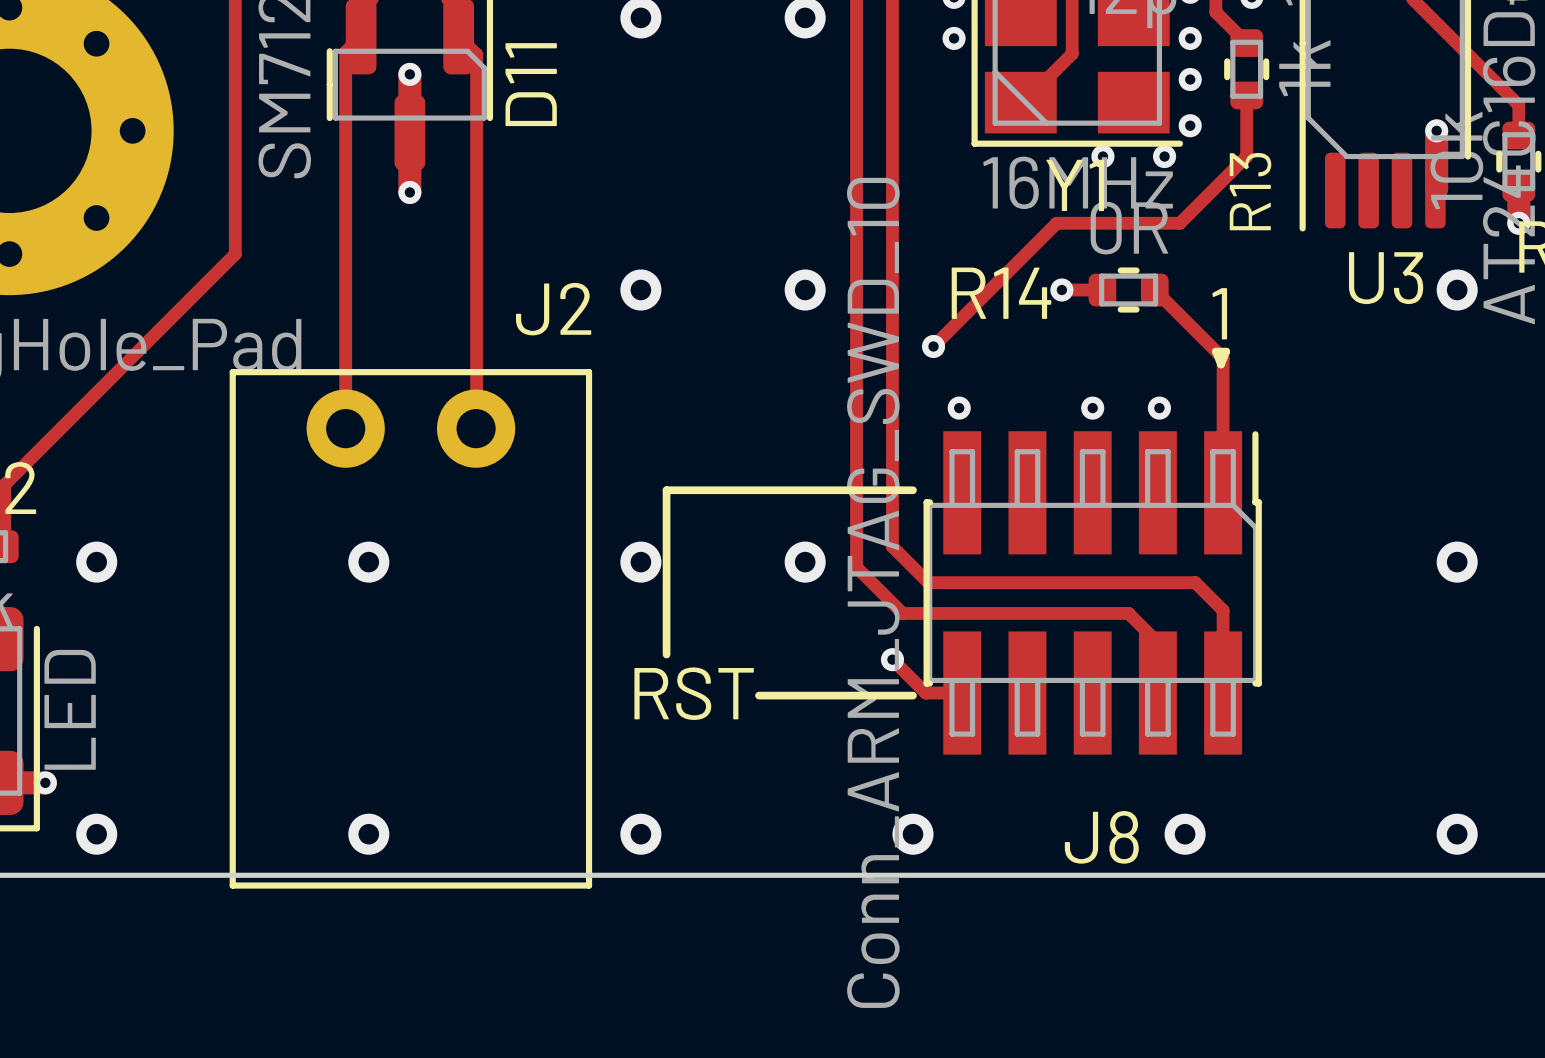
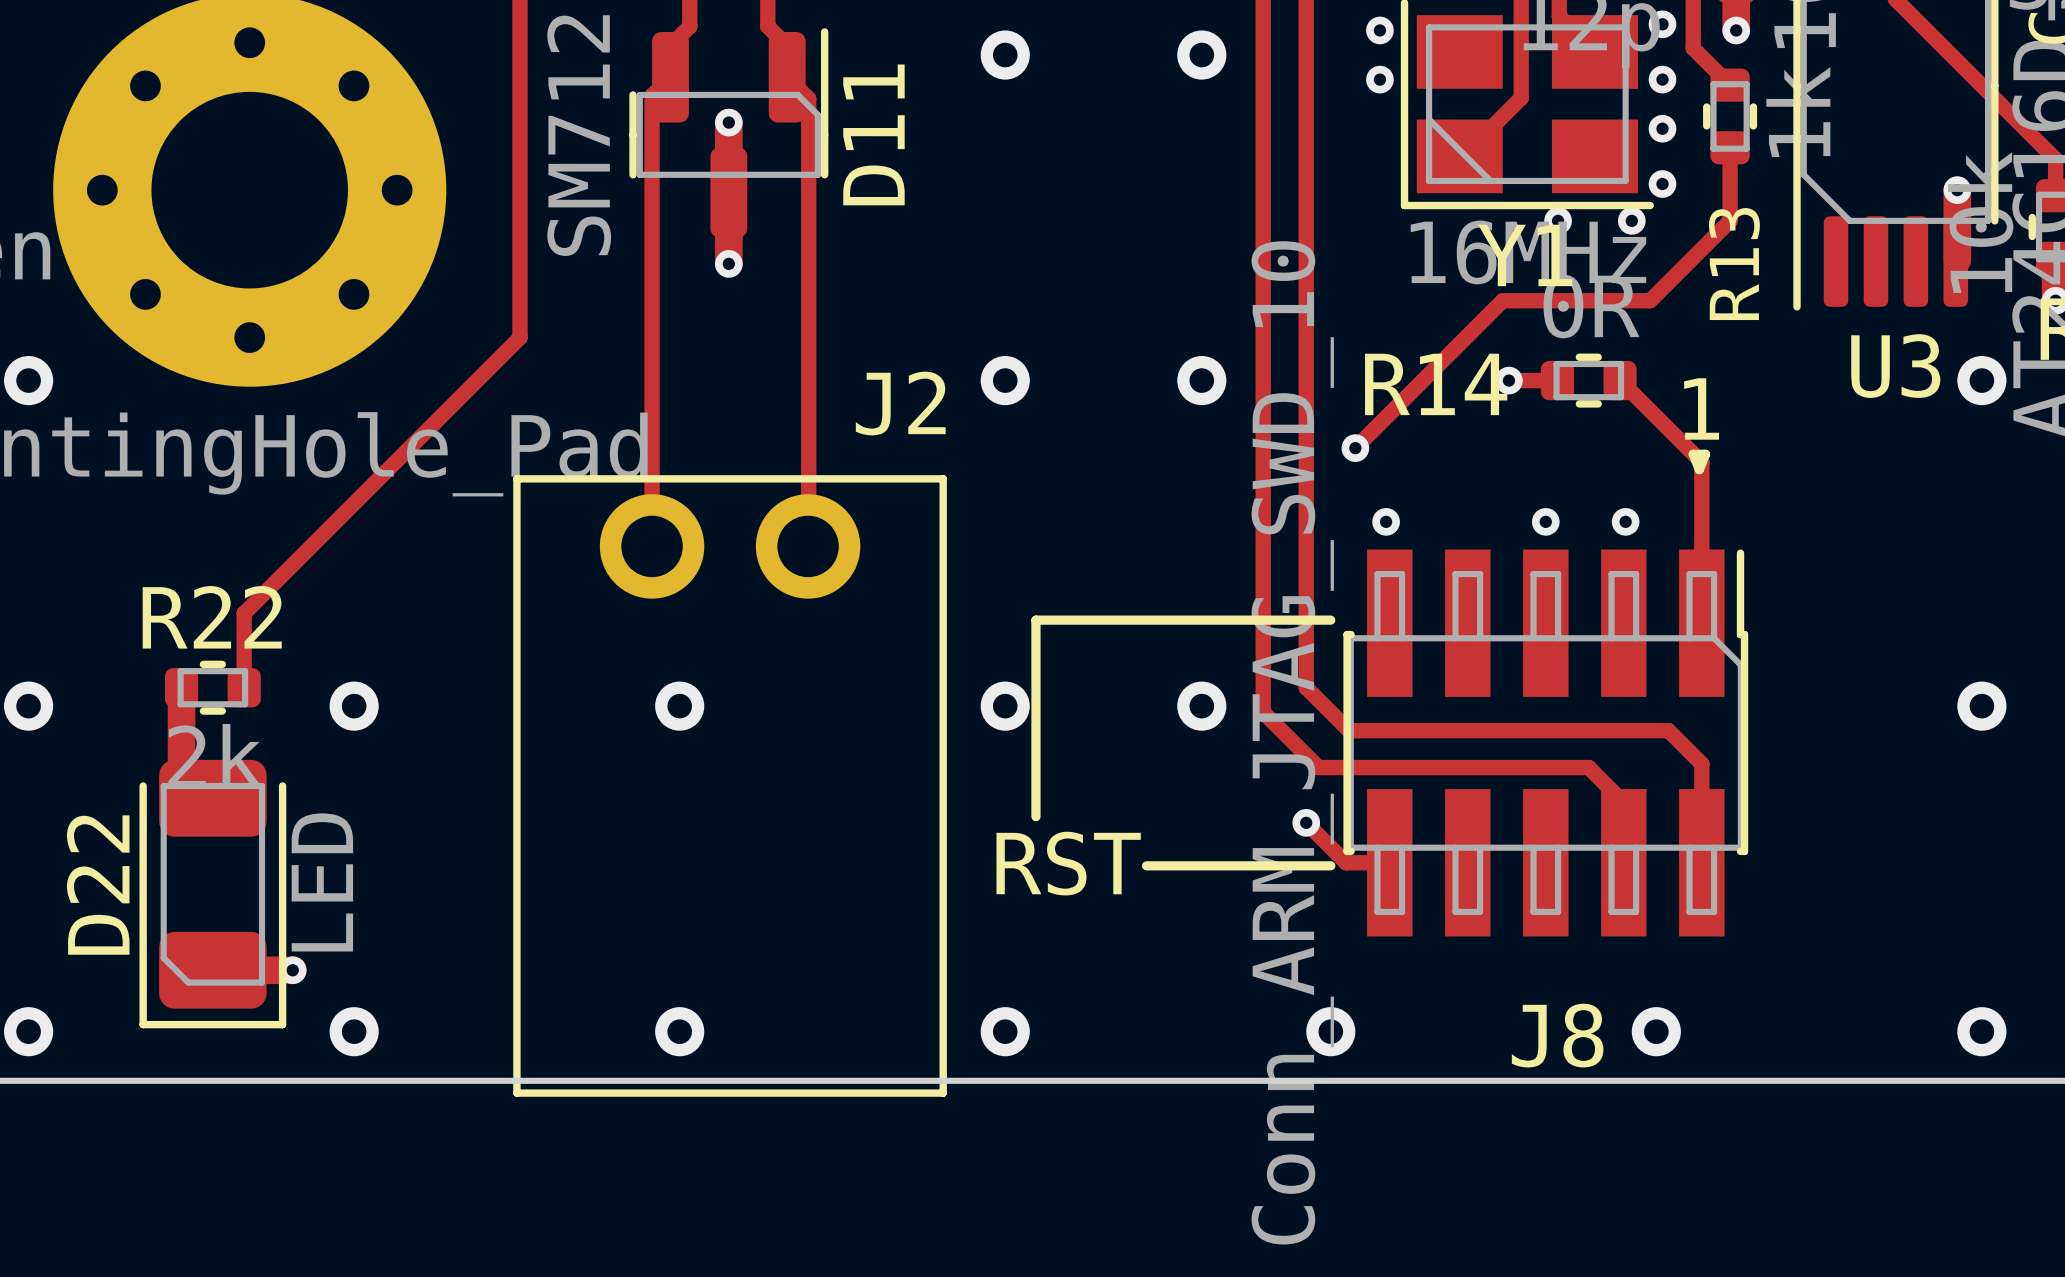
J2 footprint: [229, 369, 593, 889] -> [513, 475, 947, 1097]

